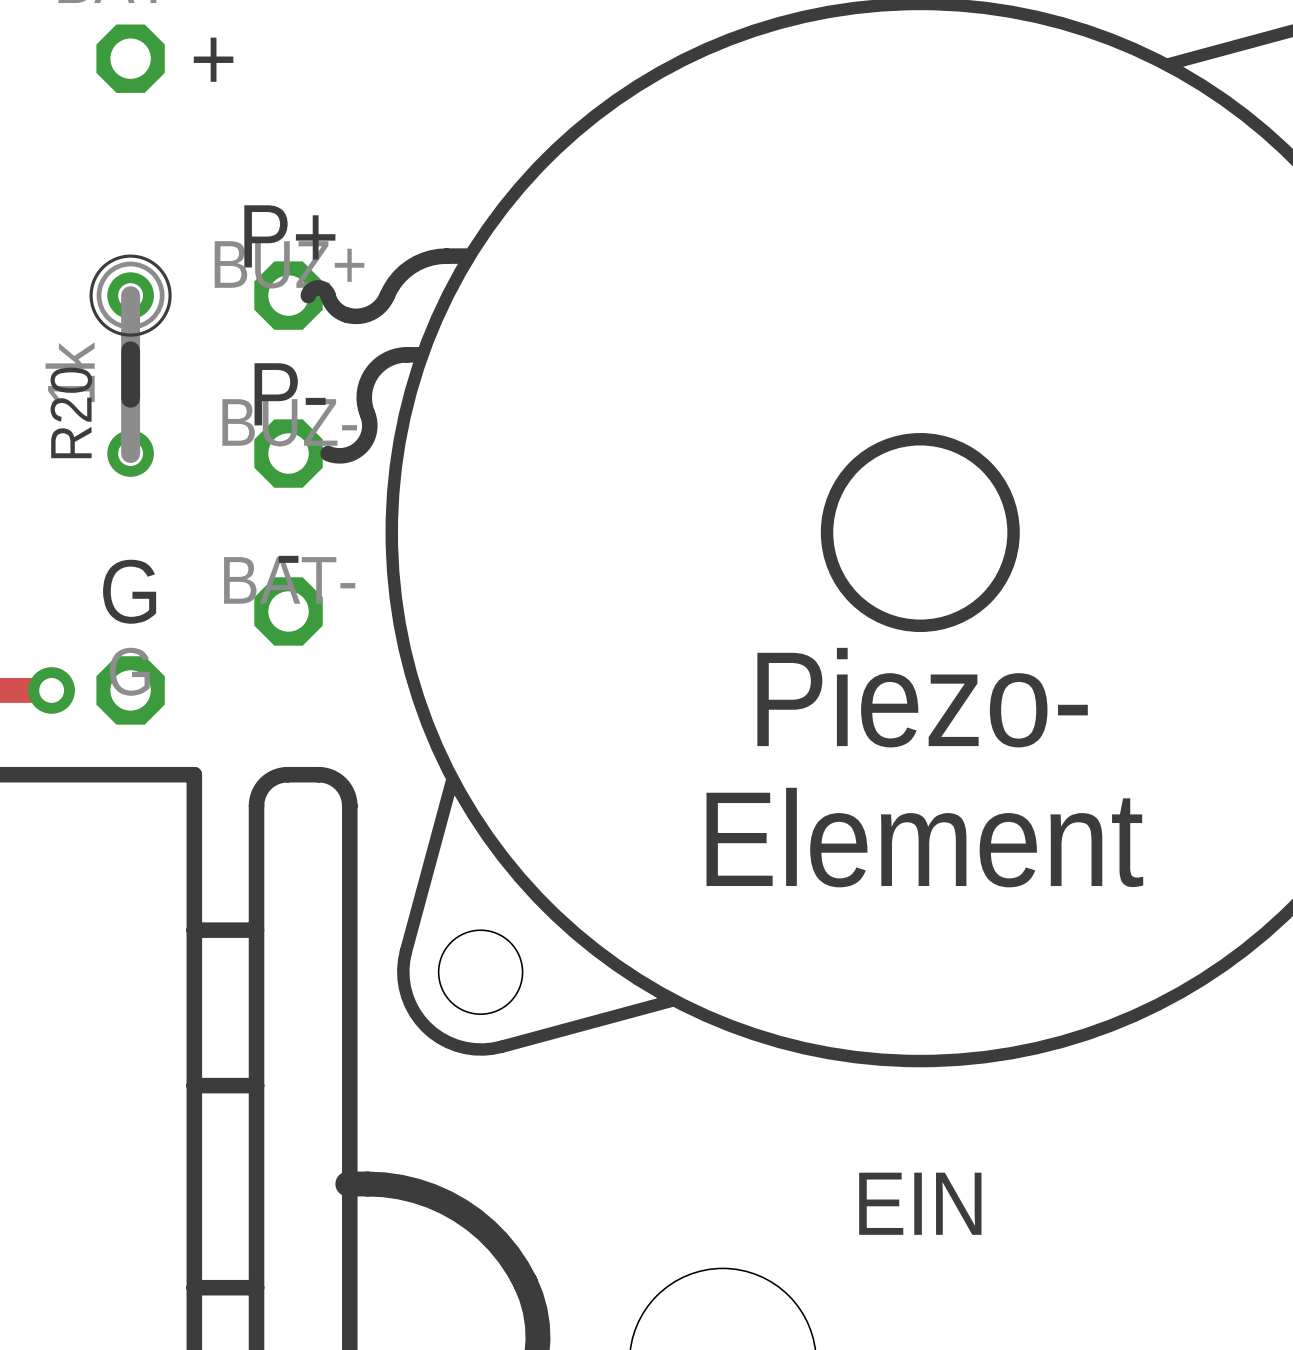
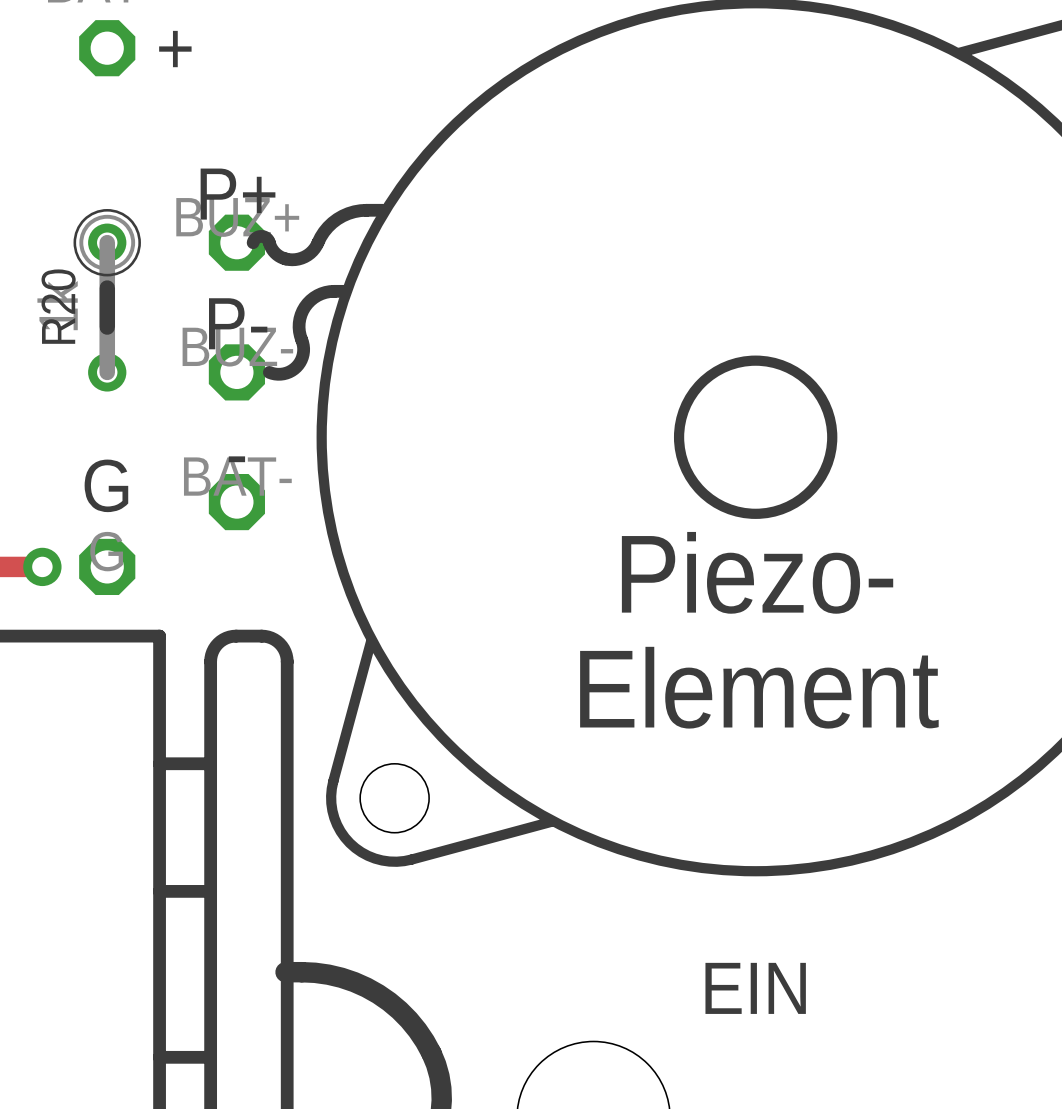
R20 name position: R20 (71, 412) -> R20 (58, 306)

